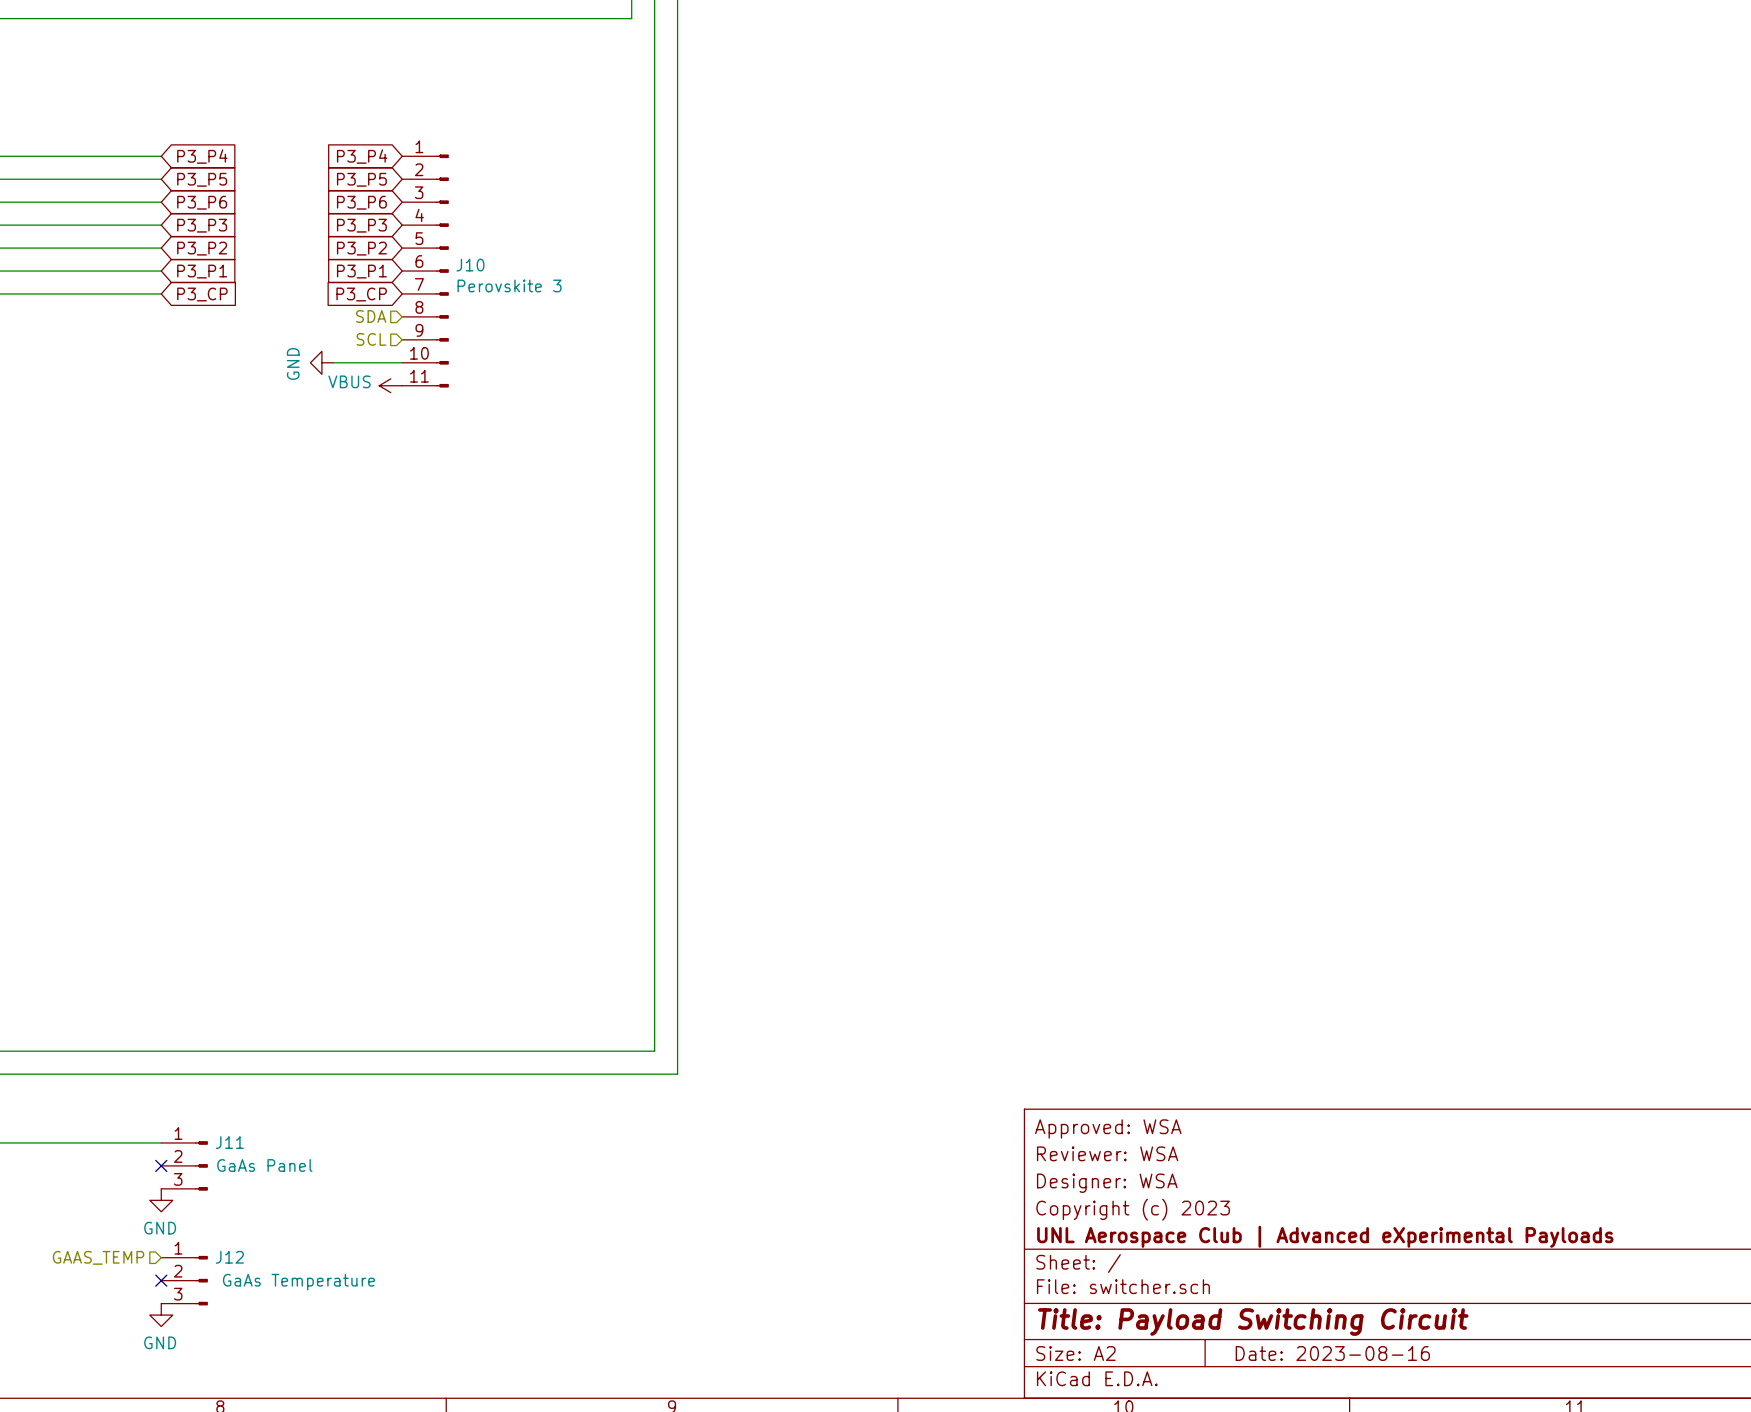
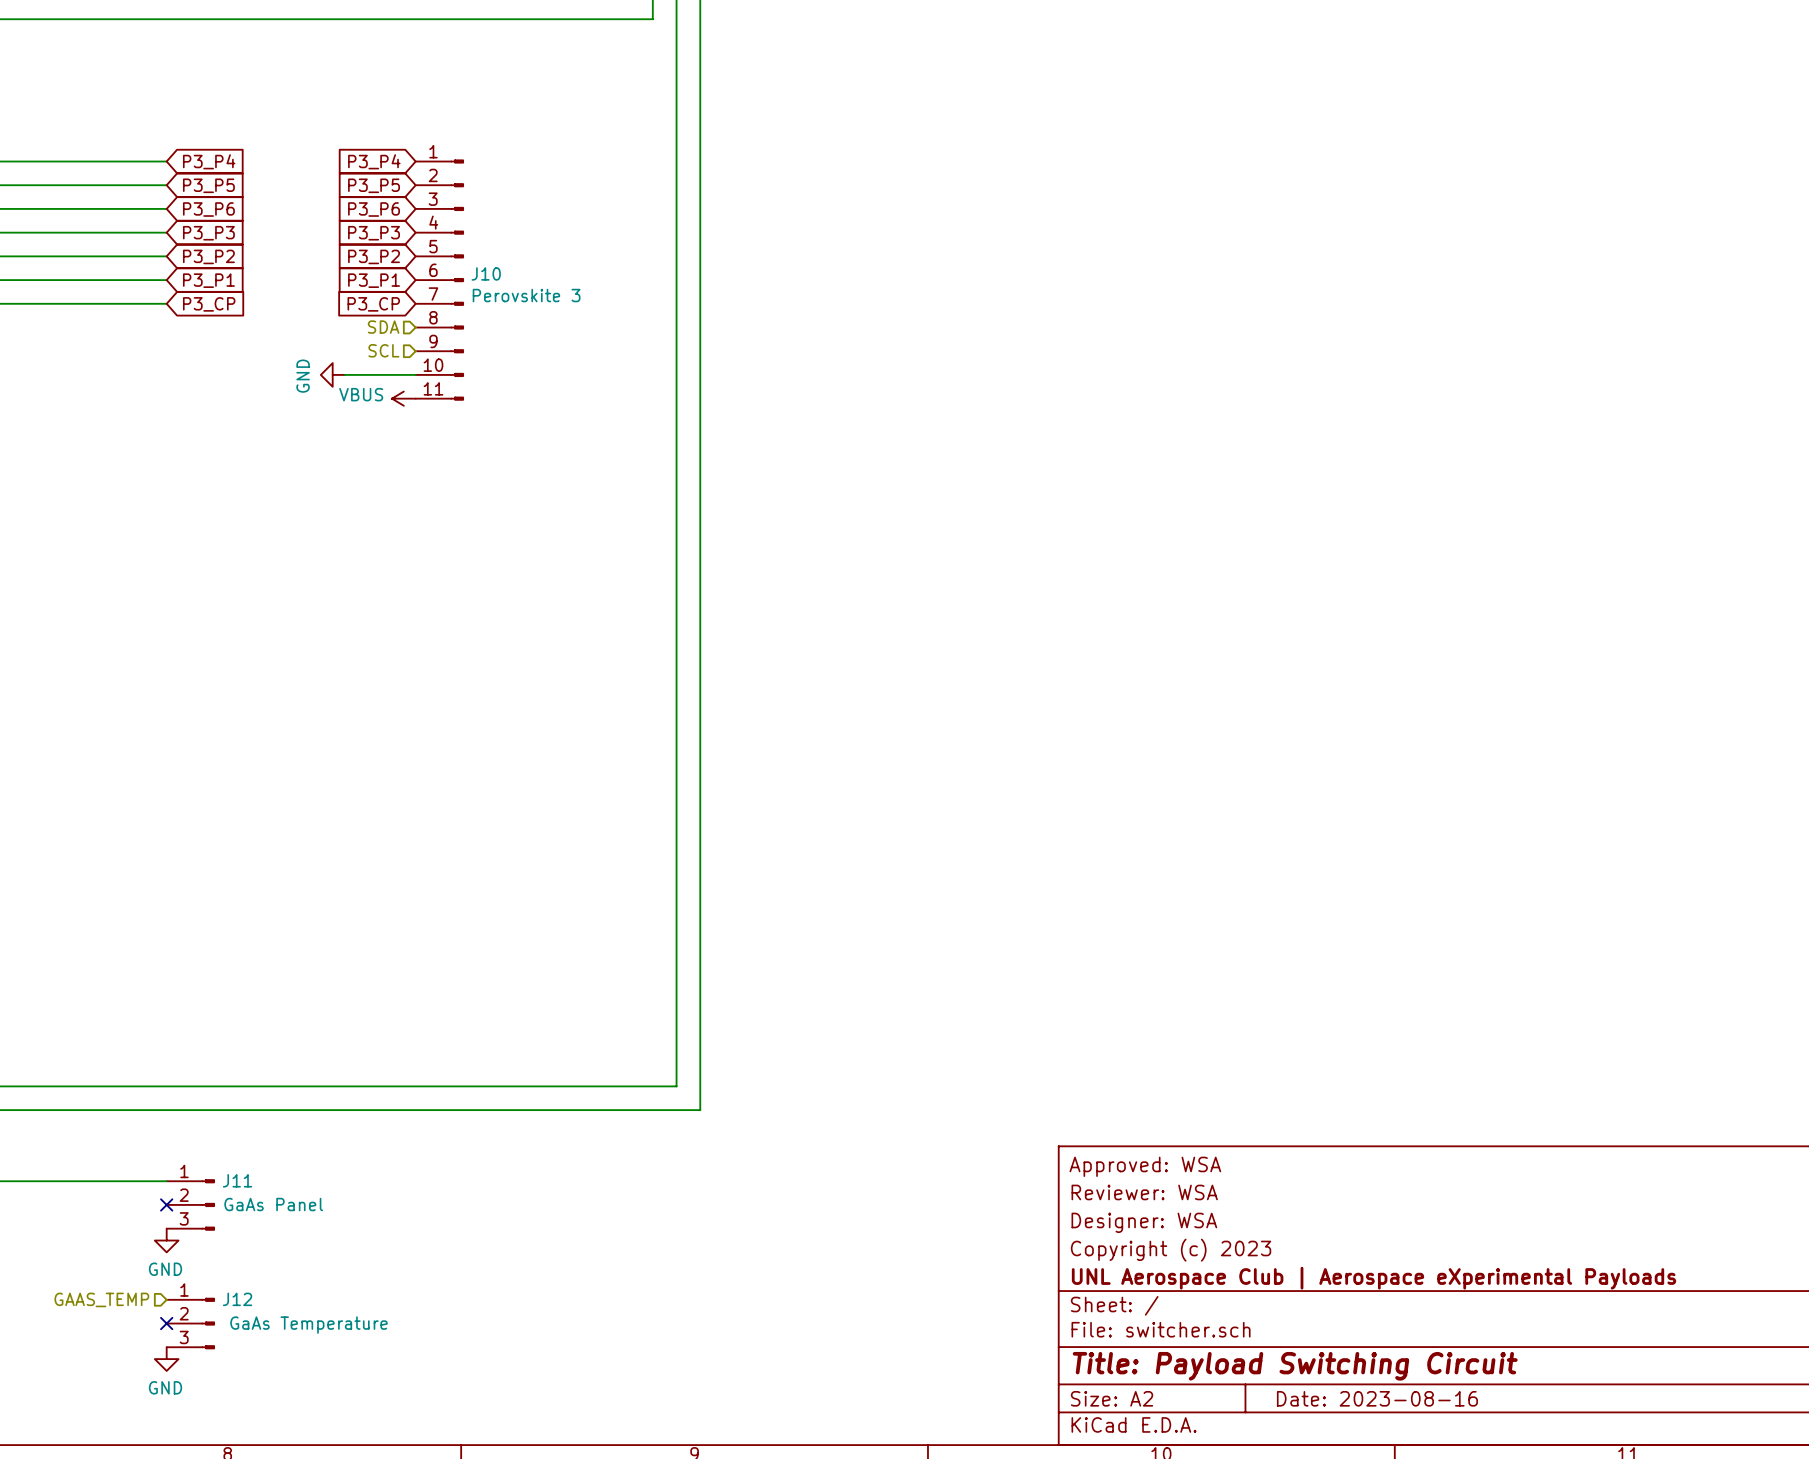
title block: UNL Aerospace Club | Advanced eXperimental Payloads (1325, 1236) -> UNL Aerospace Club | Aerospace eXperimental Payloads (1374, 1278)

